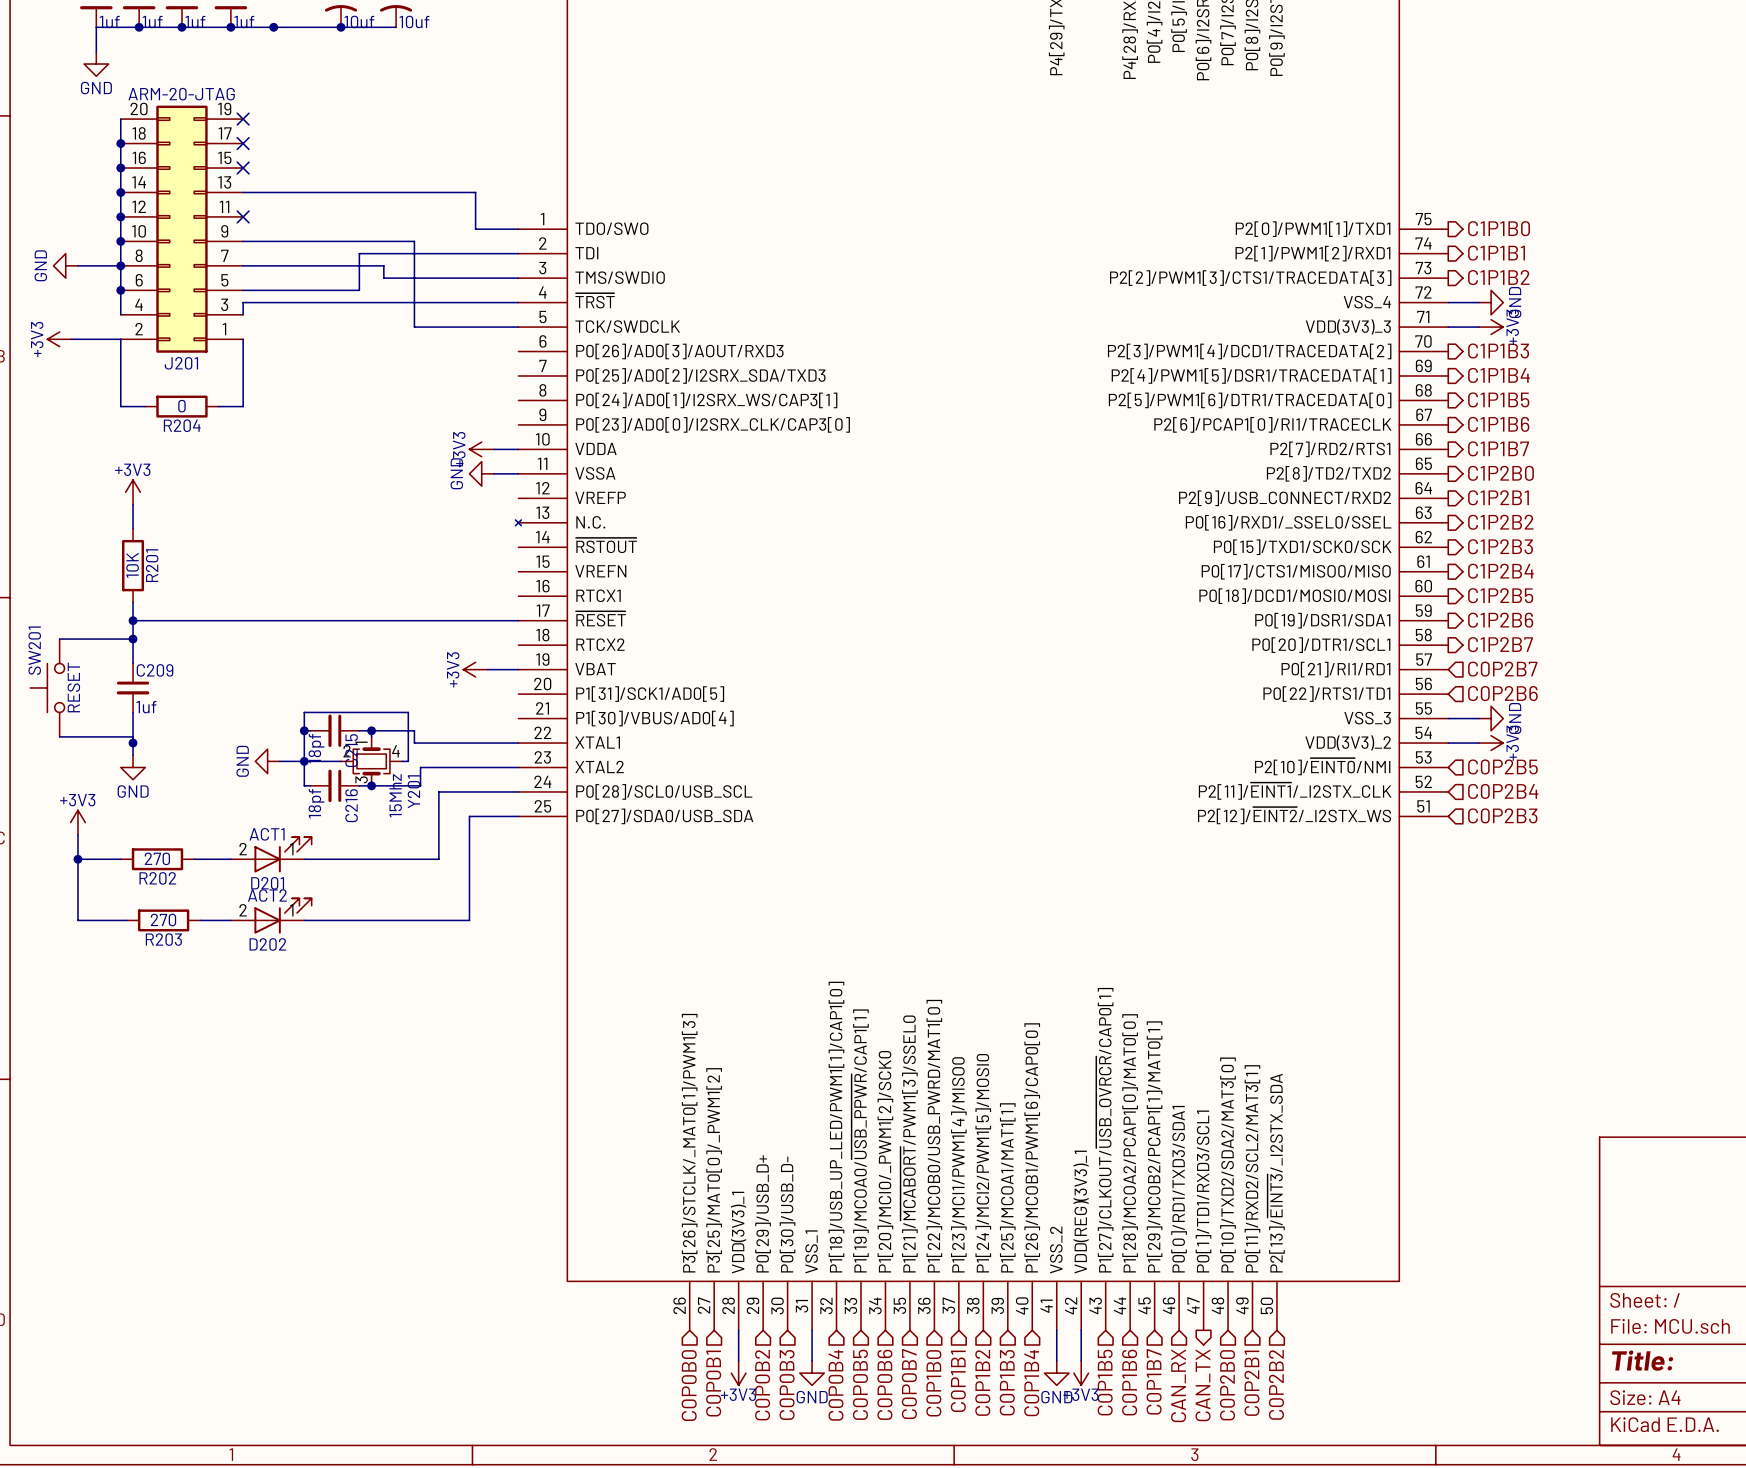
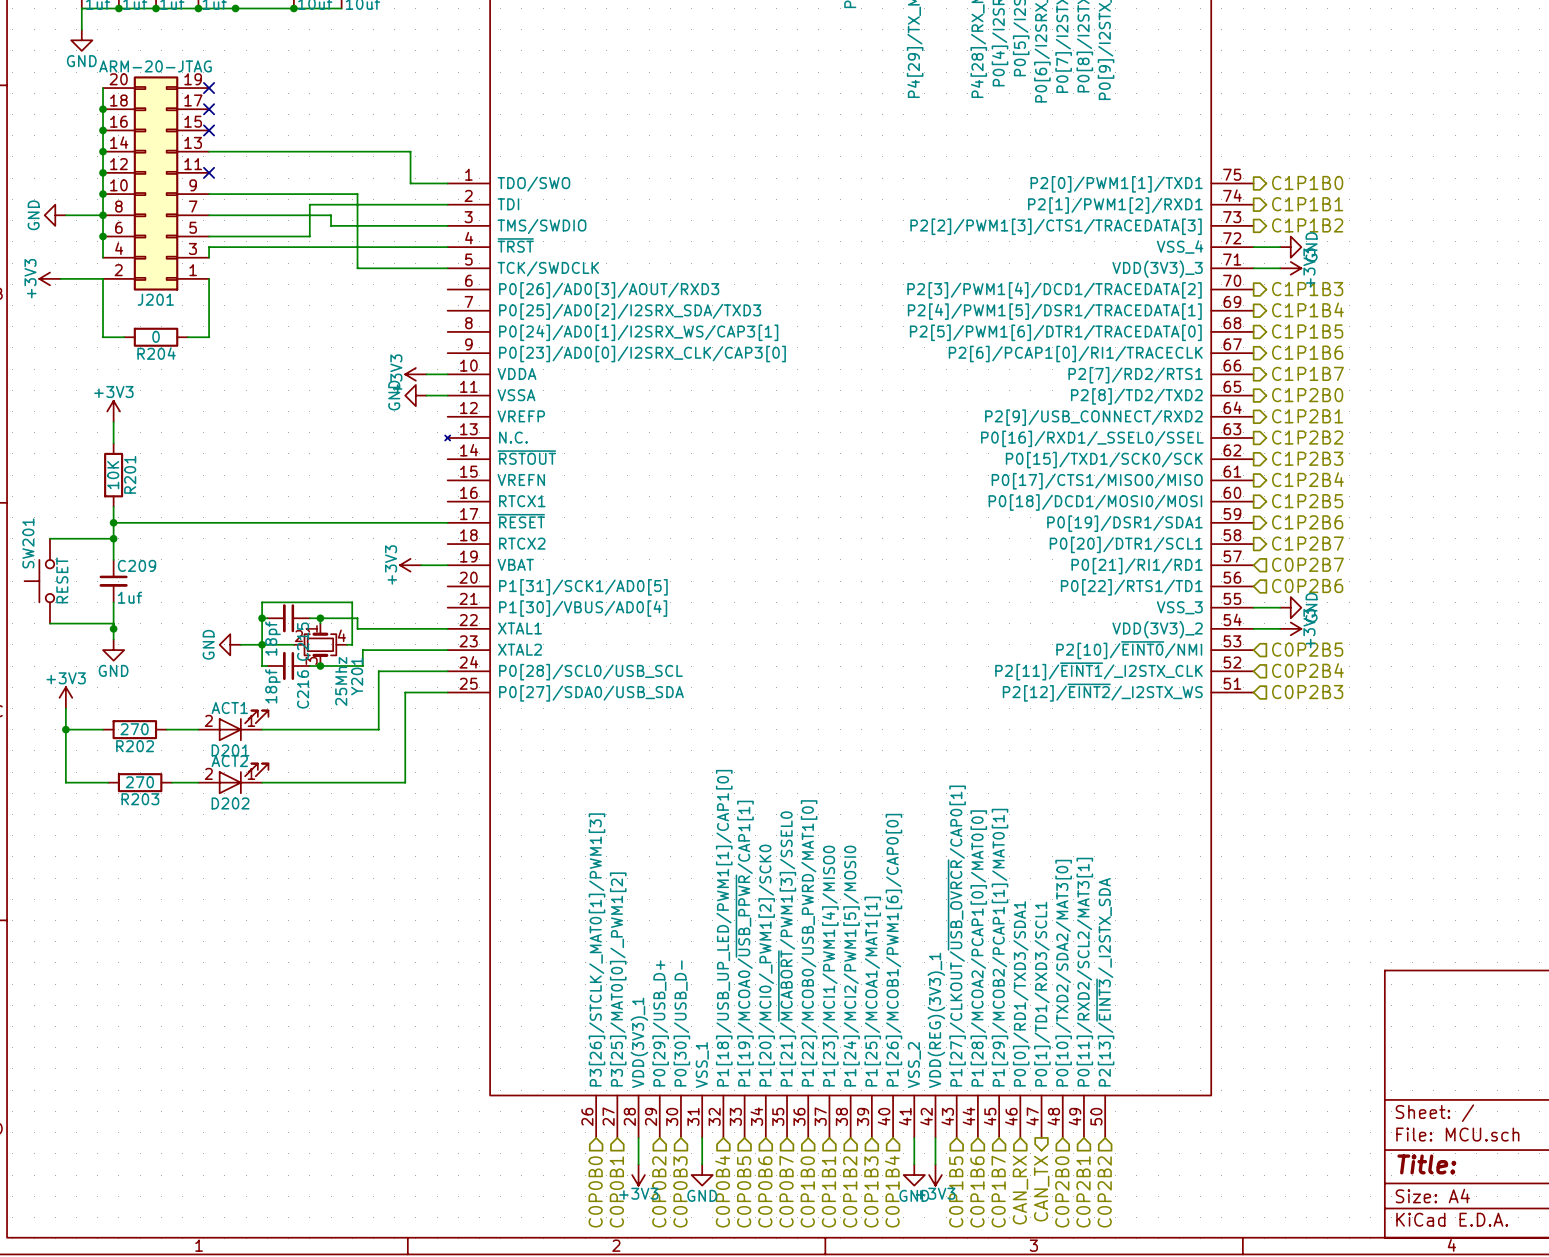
Y201 value: 15Mhz (395, 795) -> 25Mhz (341, 681)

